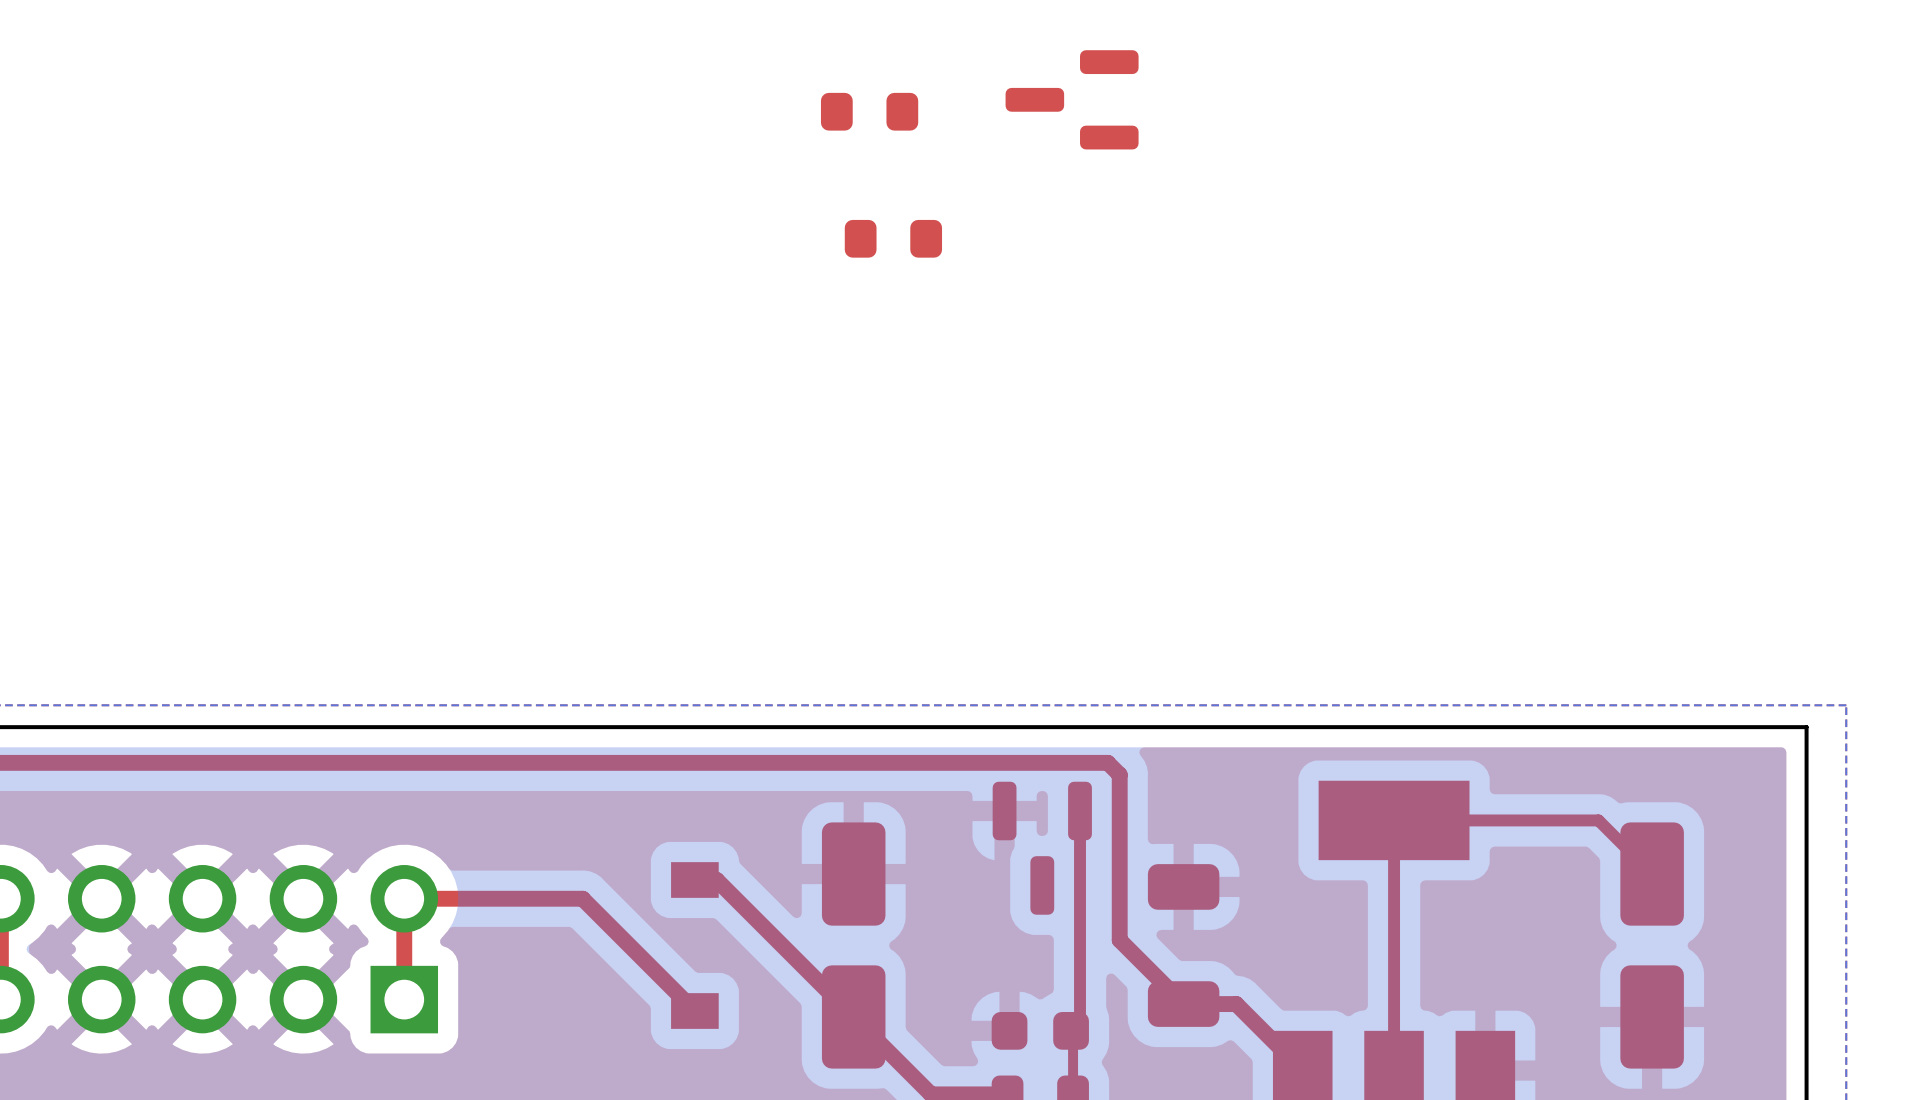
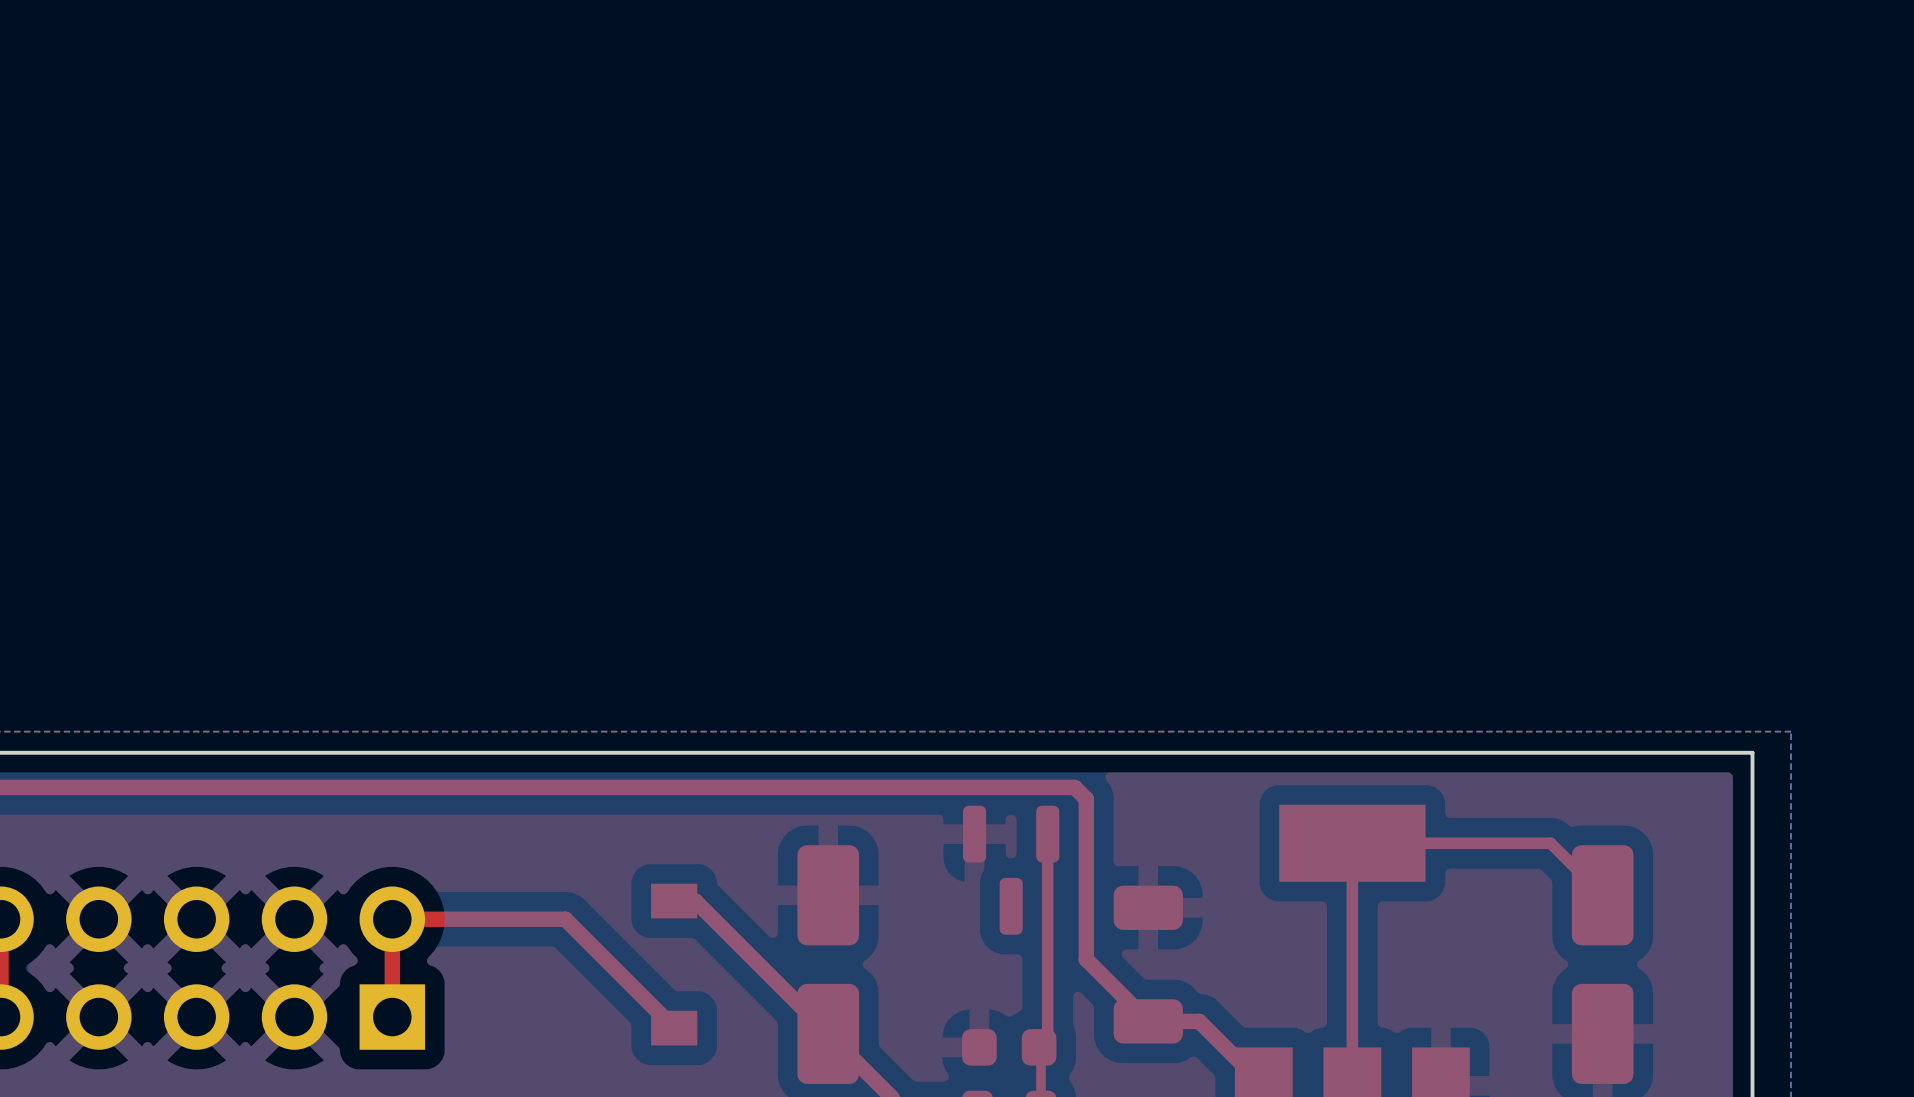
part: (1072, 99) -> none
part: (869, 111) -> none
part: (893, 238) -> none

